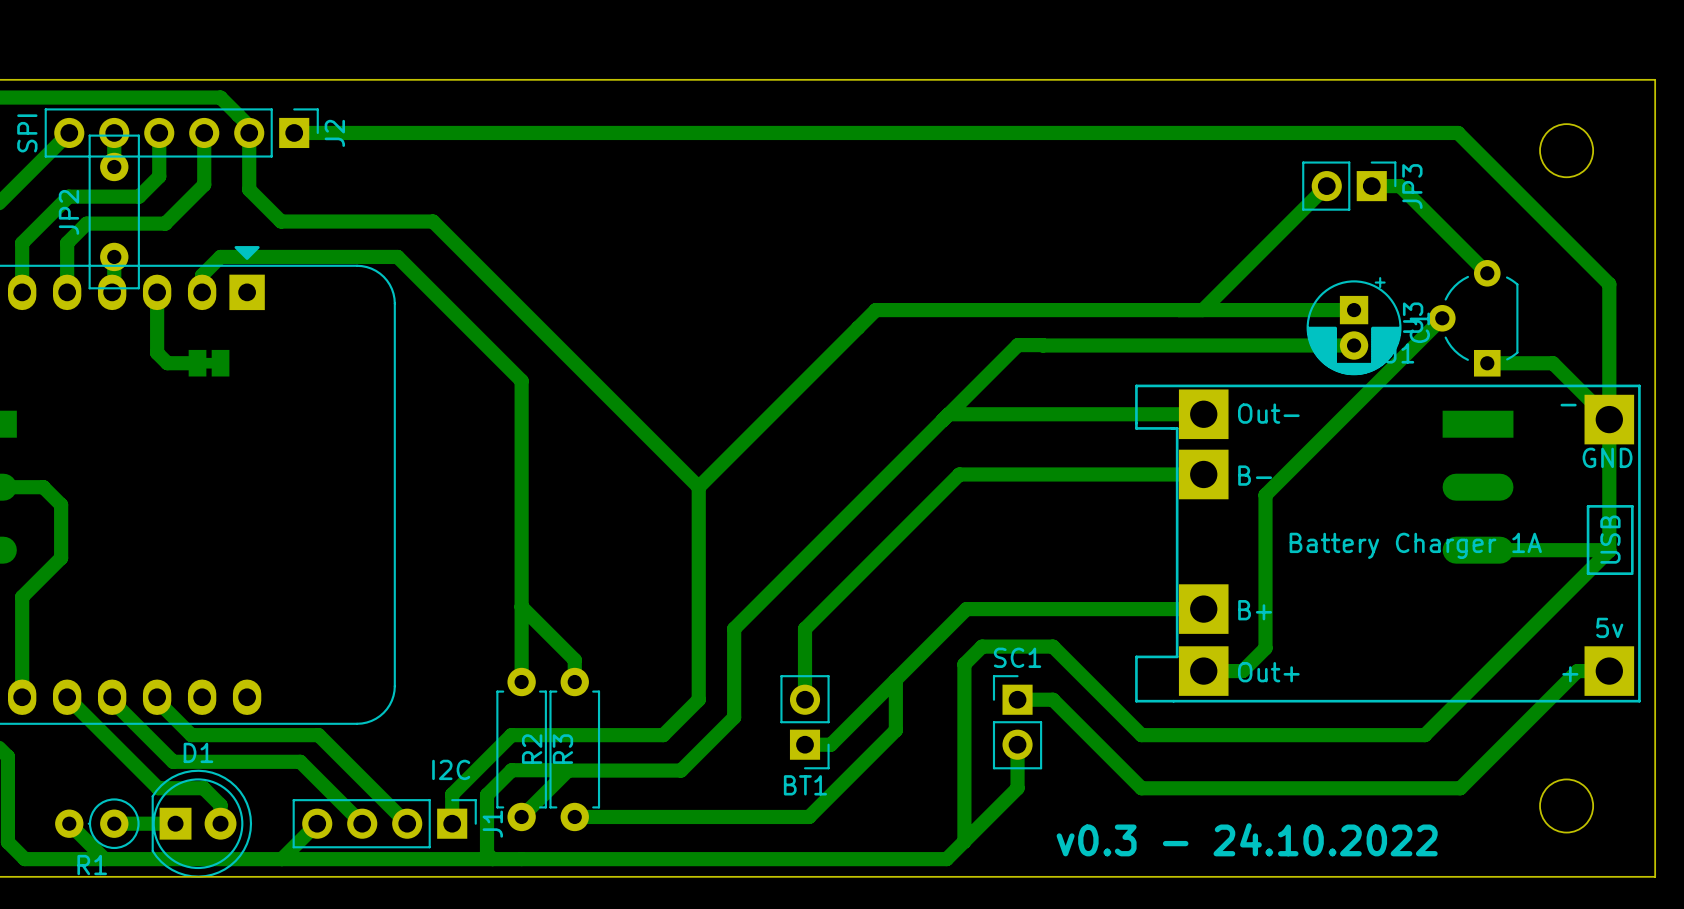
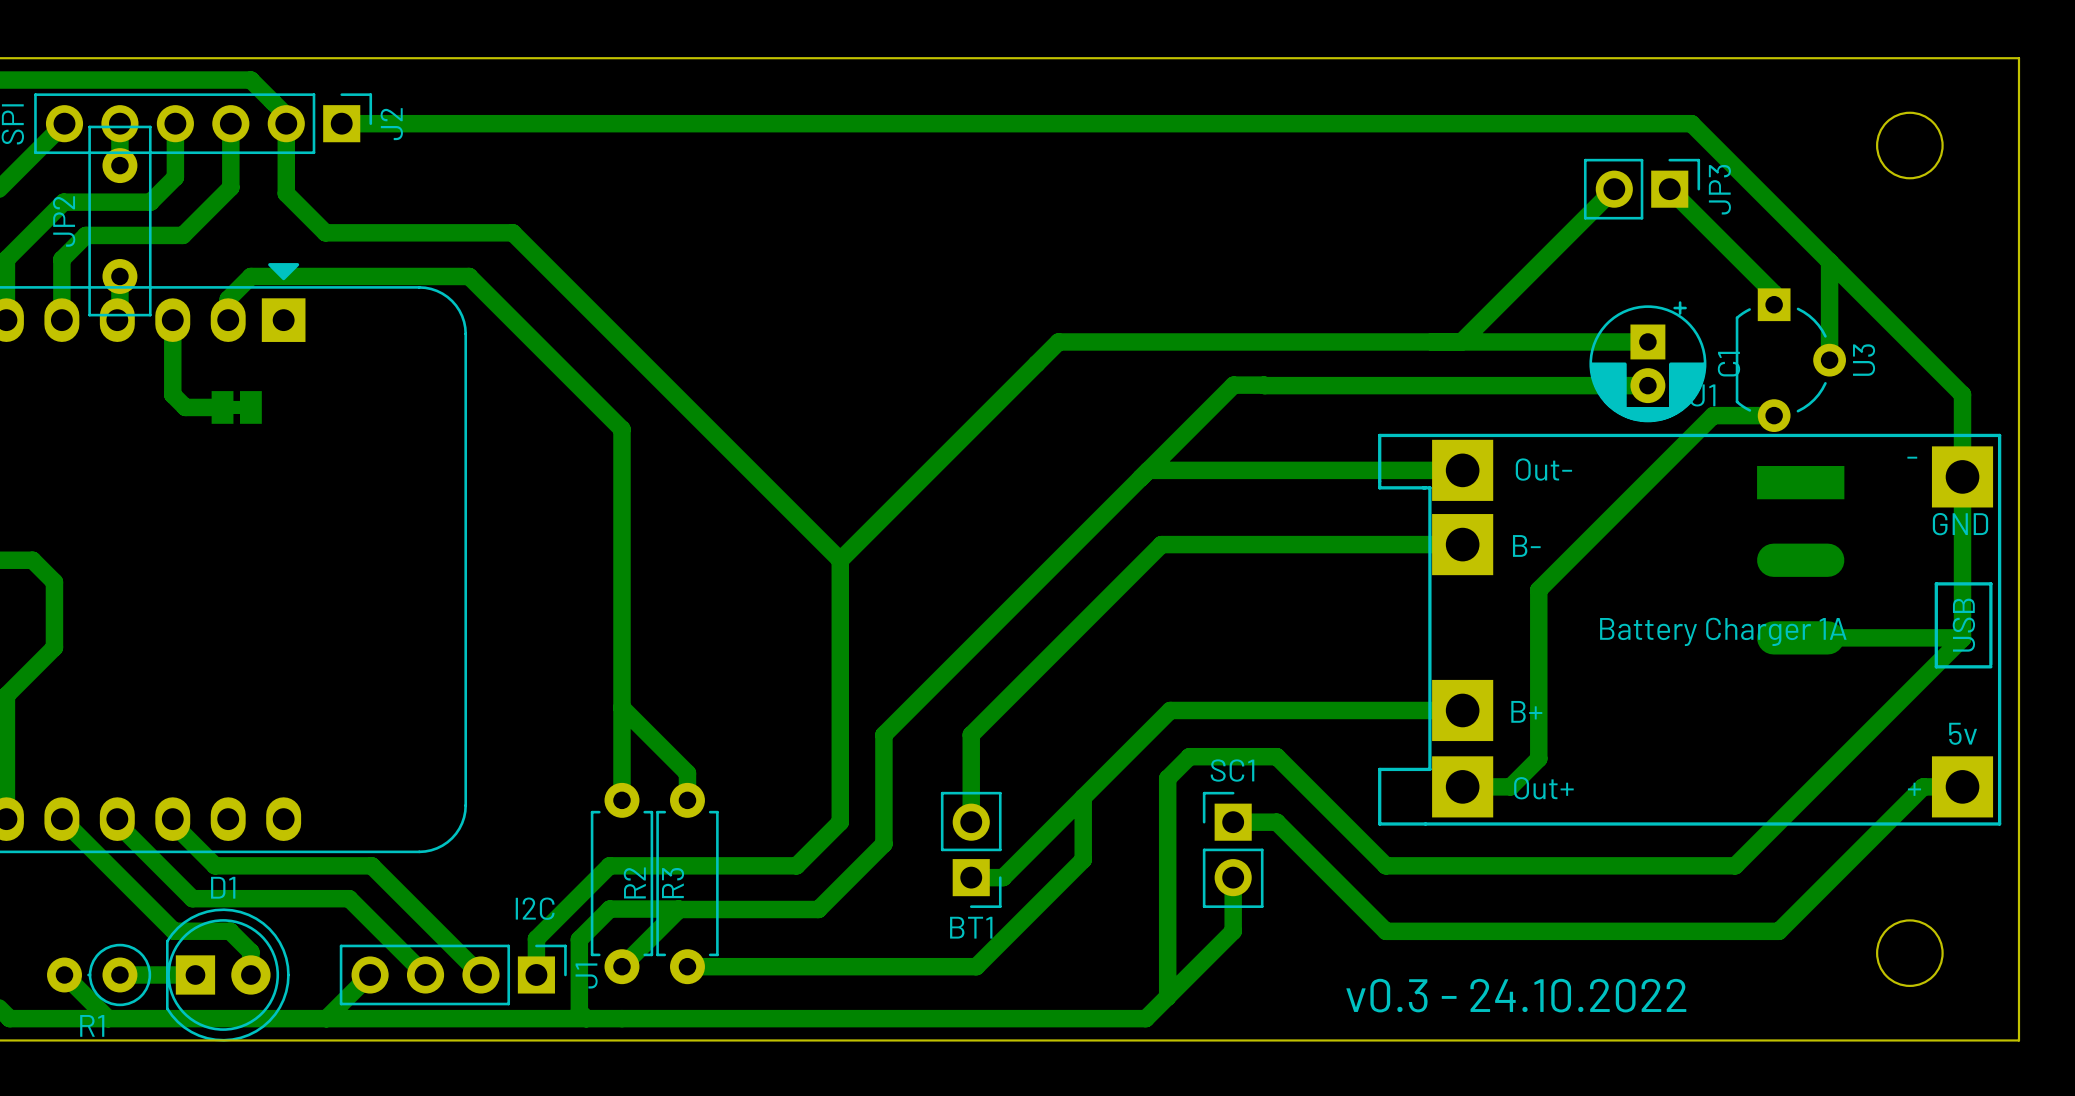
bottom track: (1389, 132) (1458, 132) (1609, 284) (1609, 352) -> (1691, 123) (1962, 394)
bottom track: (1371, 186) (1400, 186) (1487, 273) -> (1669, 189) (1774, 293) (1774, 304)
bottom track: none -> (1829, 261) (1829, 360)
bottom track: (1442, 318) (1265, 495) (1265, 511) -> (1774, 415) (1713, 415) (1538, 590)
U3 rotation: 0° (1473, 318) -> 180° (1790, 360)
bottom track: (1487, 363) (1553, 363) (1609, 419) -> none

